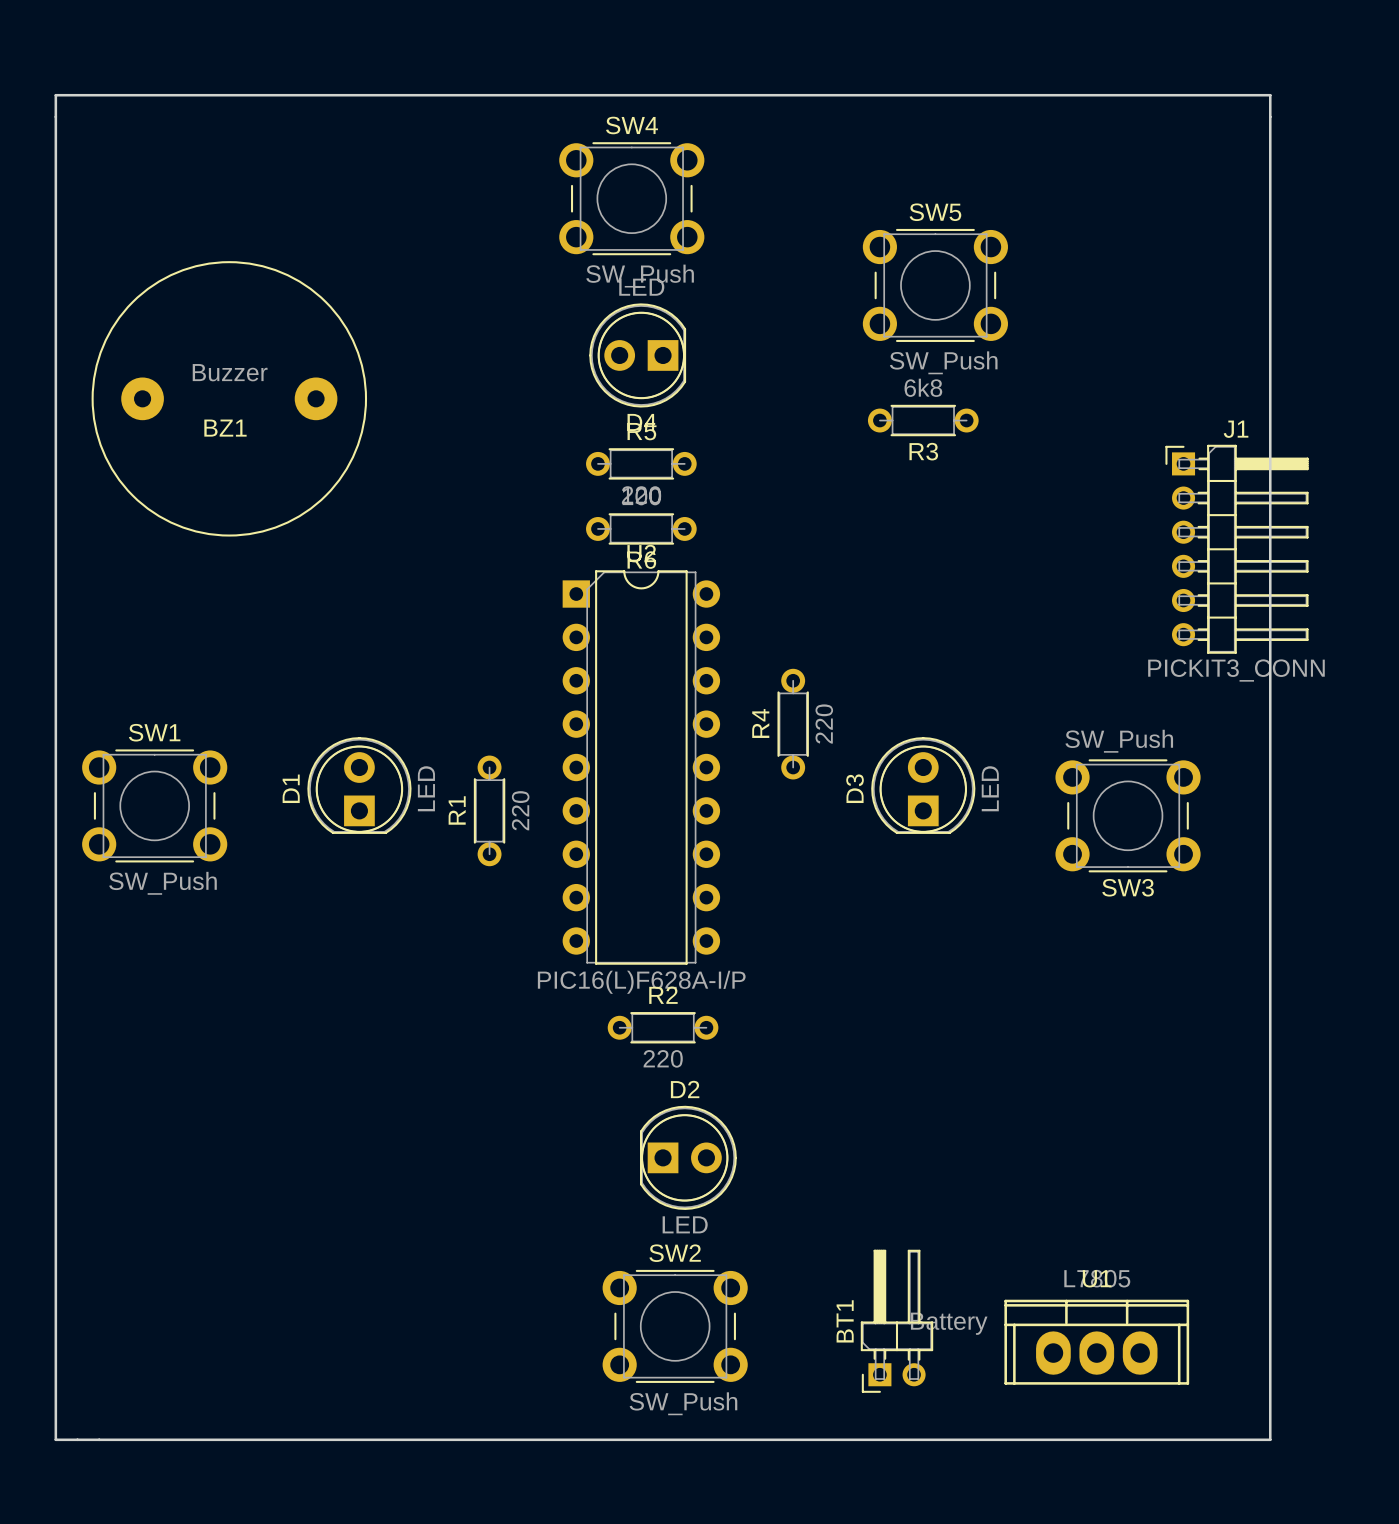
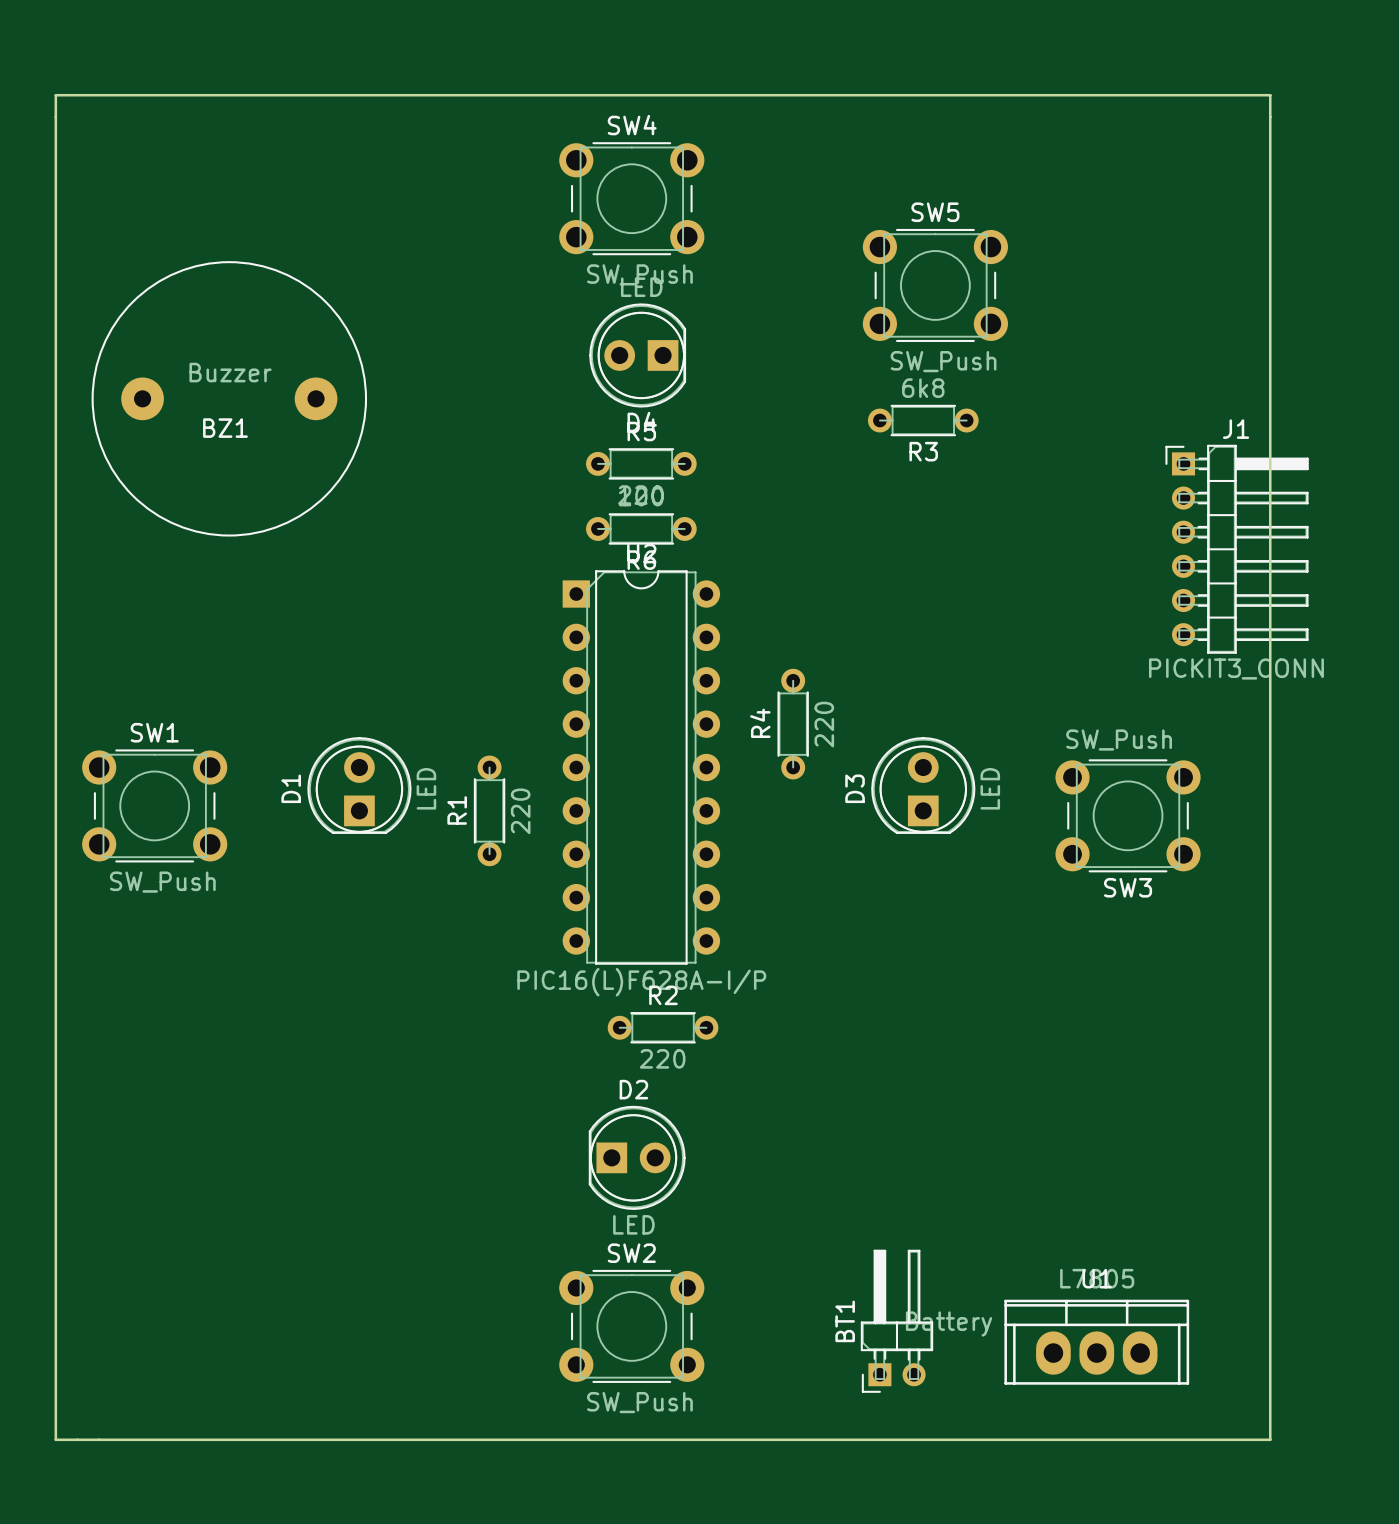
D2 position: (688, 1157) -> (637, 1157)
SW2 footprint: [602, 1269, 748, 1383] -> [559, 1269, 705, 1383]

